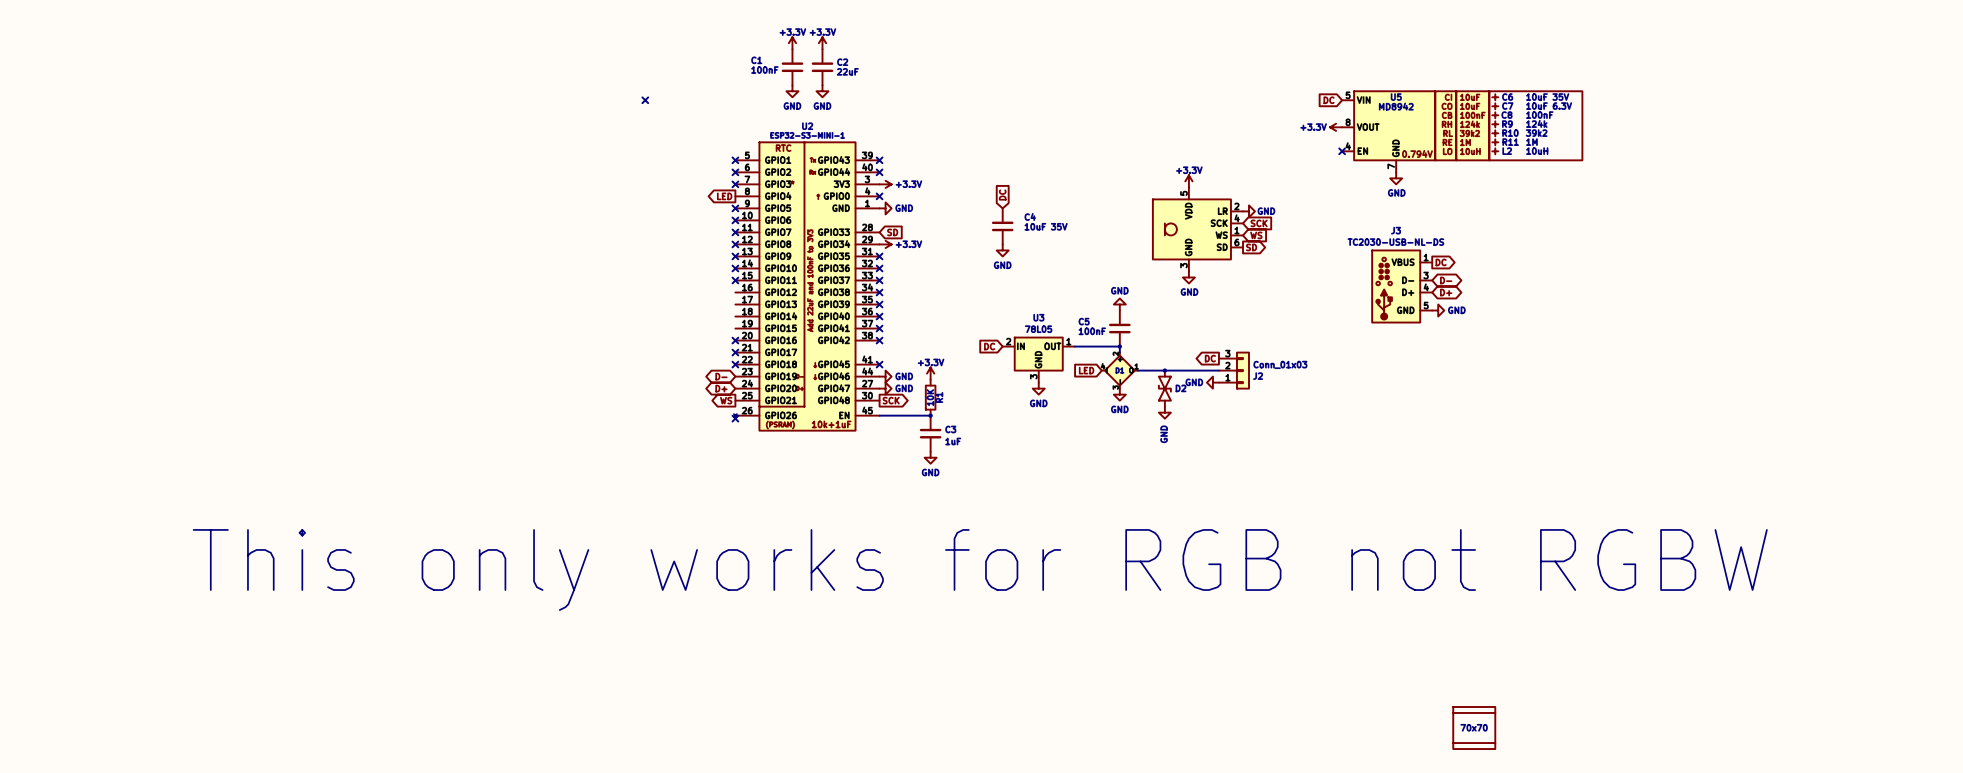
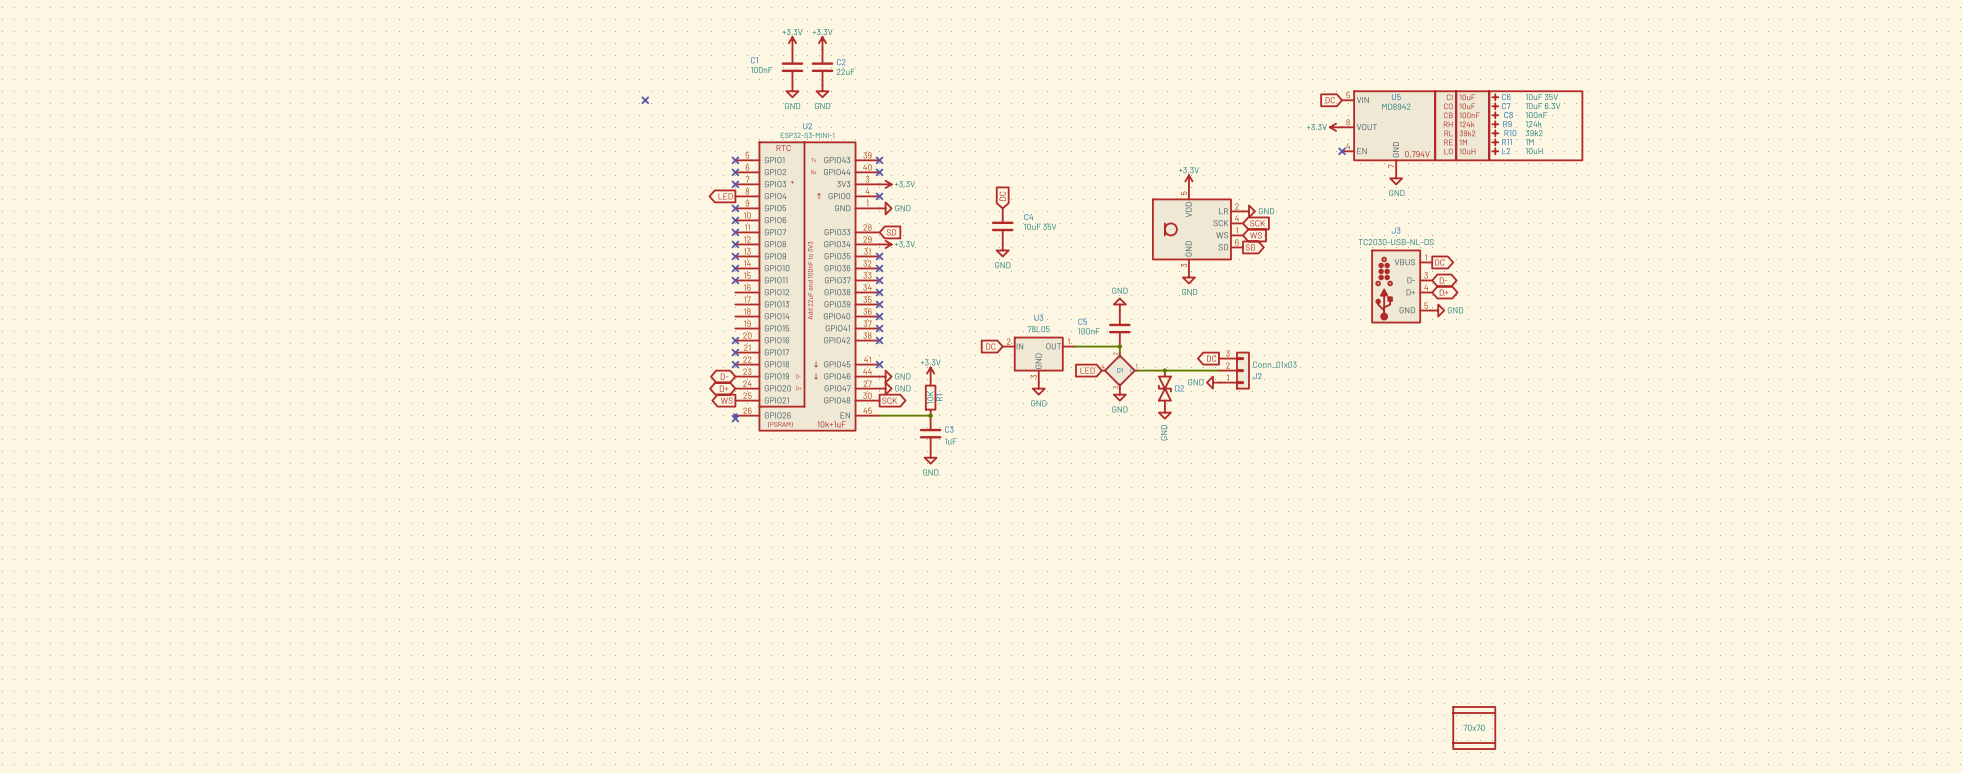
text: This only works for RGB not RGBW (980, 570) -> none

